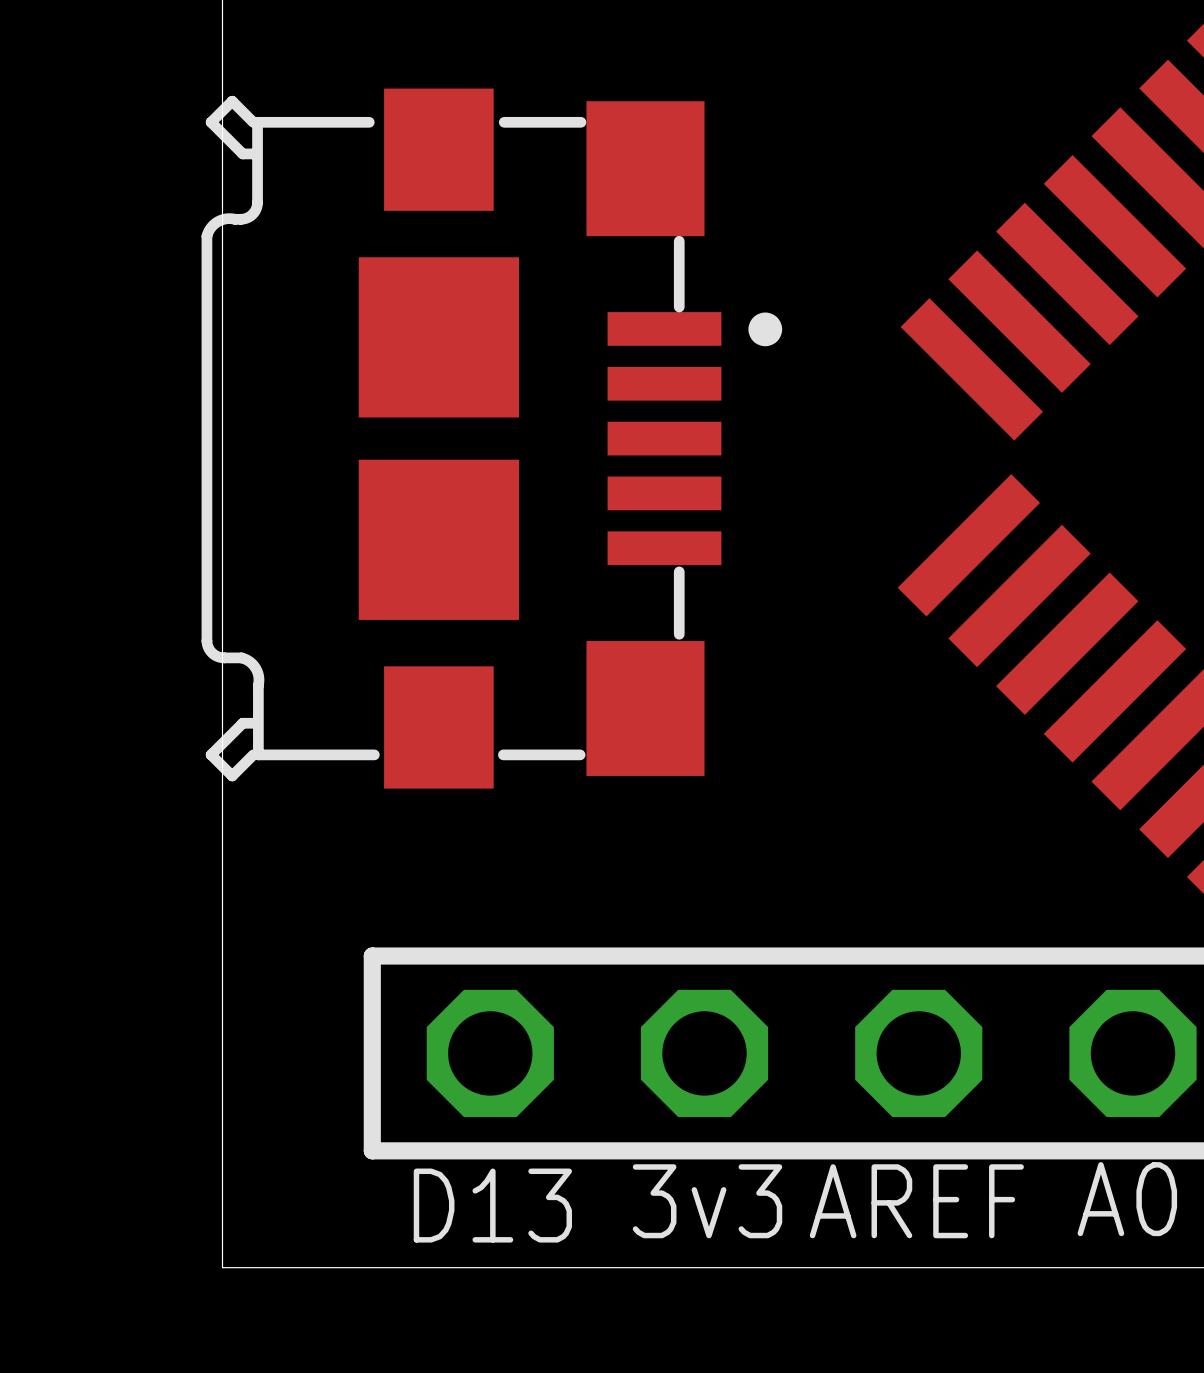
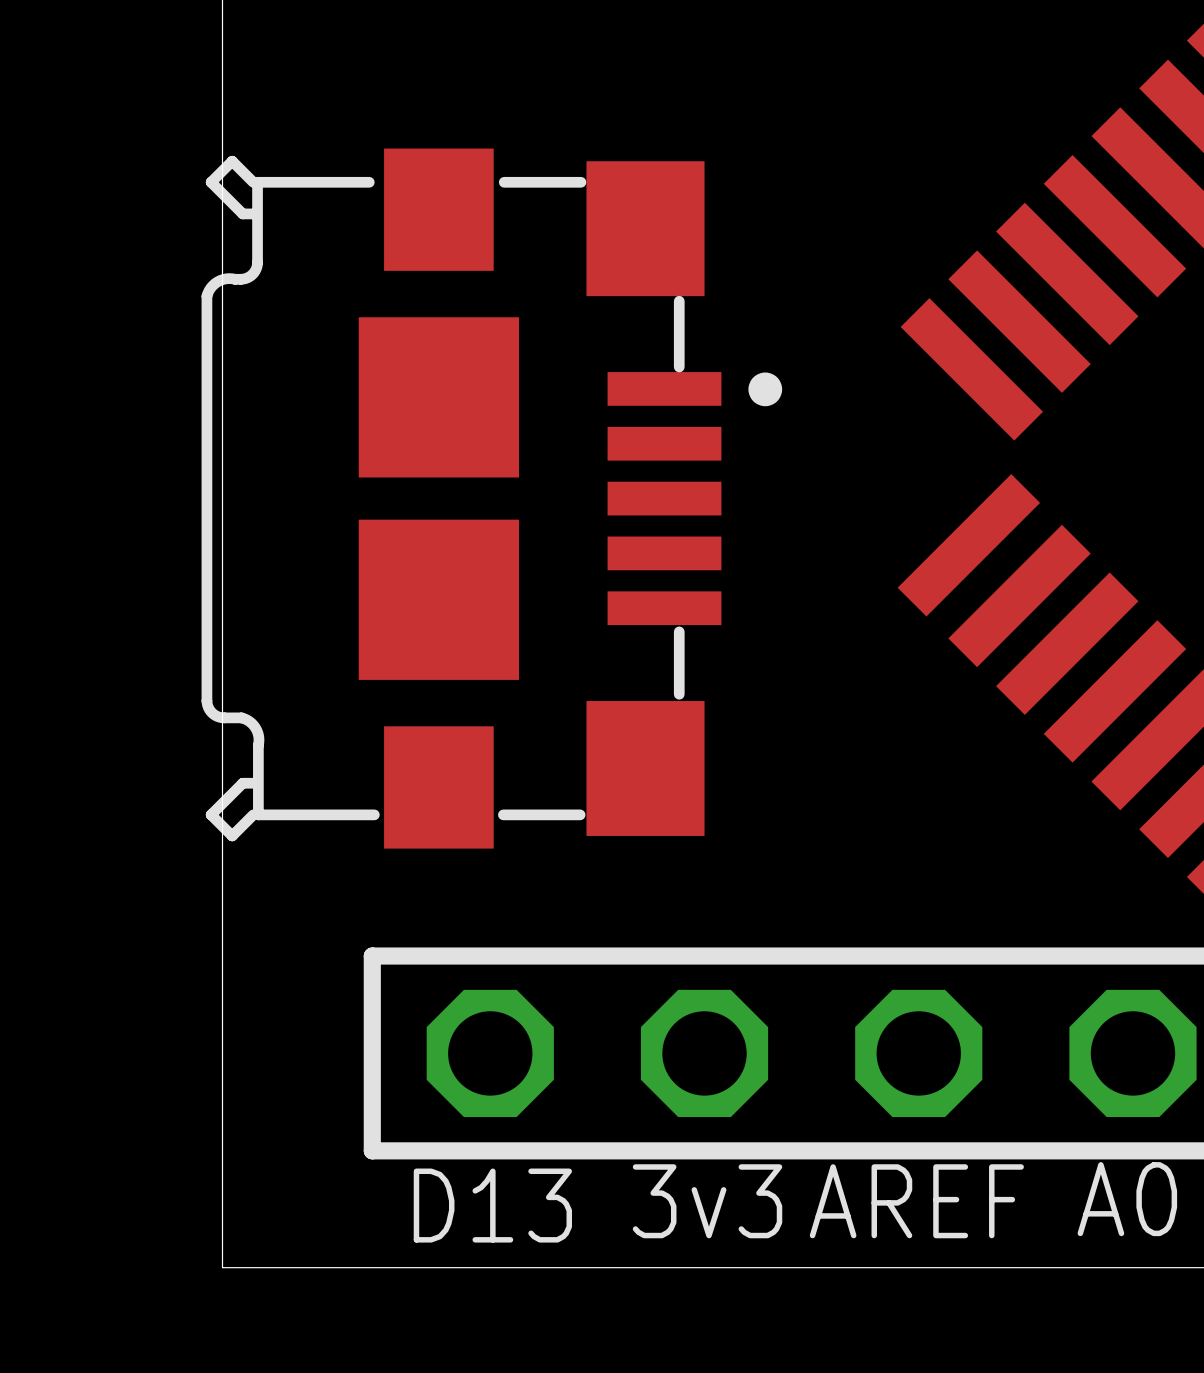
part position: (491, 438) -> (491, 498)

